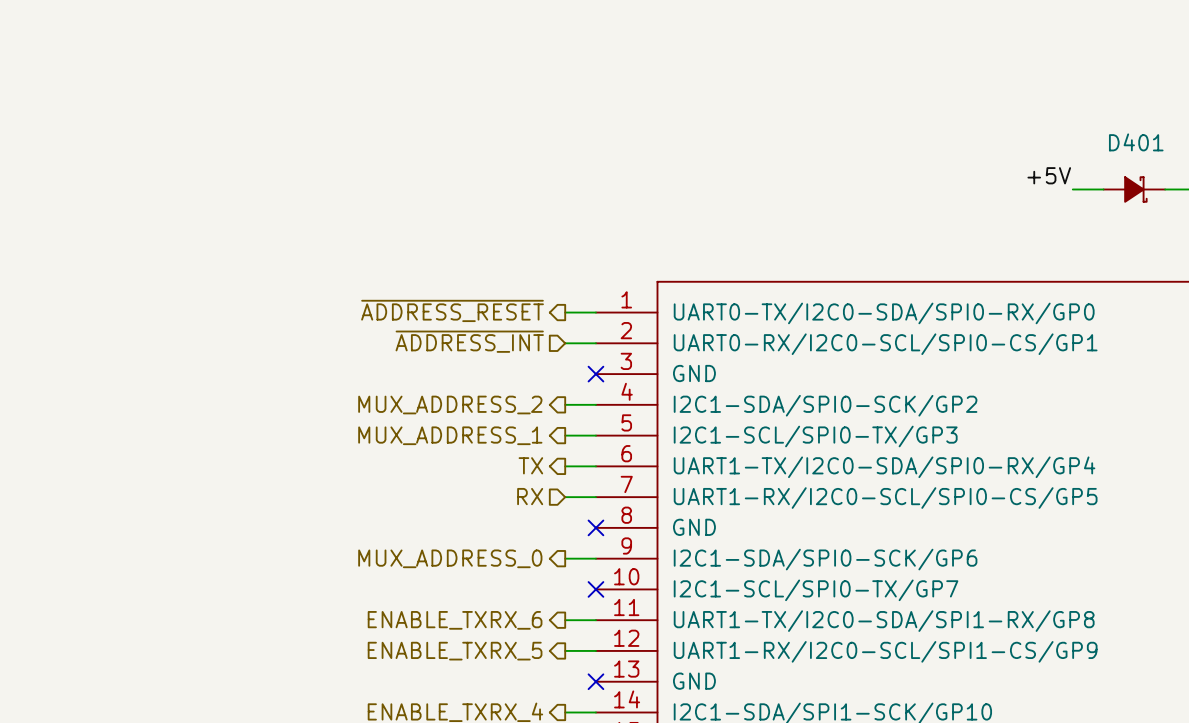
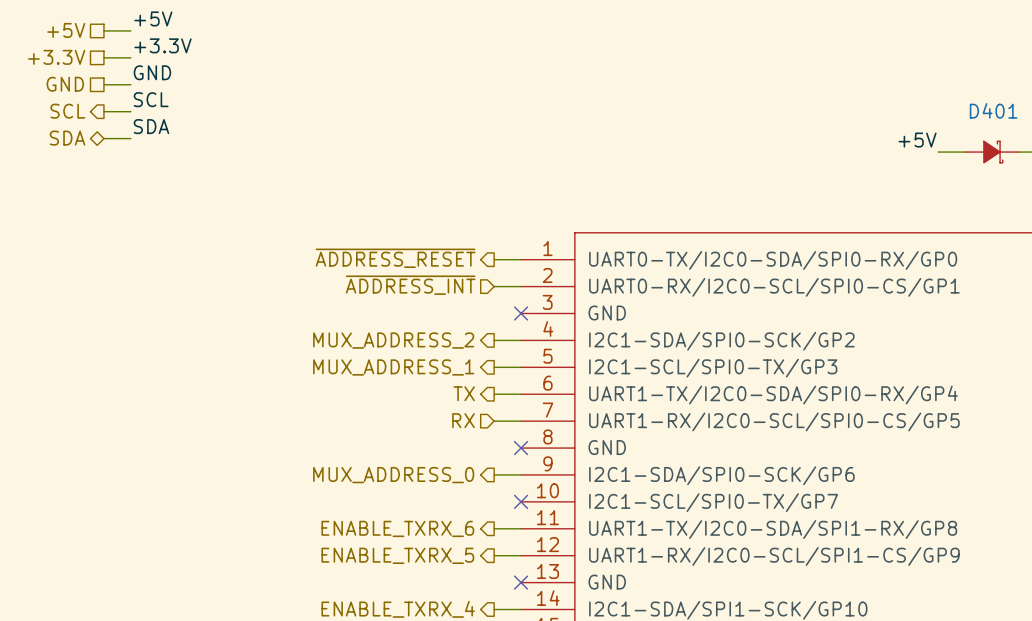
label: none -> +5V (153, 18)
hierarchical label: none -> +5V (66, 30)
wire: none -> (103, 30) (130, 30)
label: none -> +3.3V (163, 45)
hierarchical label: none -> +3.3V (56, 57)
wire: none -> (103, 57) (130, 57)
label: none -> GND (152, 72)
hierarchical label: none -> GND (65, 84)
wire: none -> (103, 84) (130, 84)
label: none -> SCL (151, 99)
hierarchical label: none -> SCL (67, 111)
wire: none -> (103, 111) (130, 111)
label: none -> SDA (151, 126)
hierarchical label: none -> SDA (67, 138)
wire: none -> (103, 138) (130, 138)

